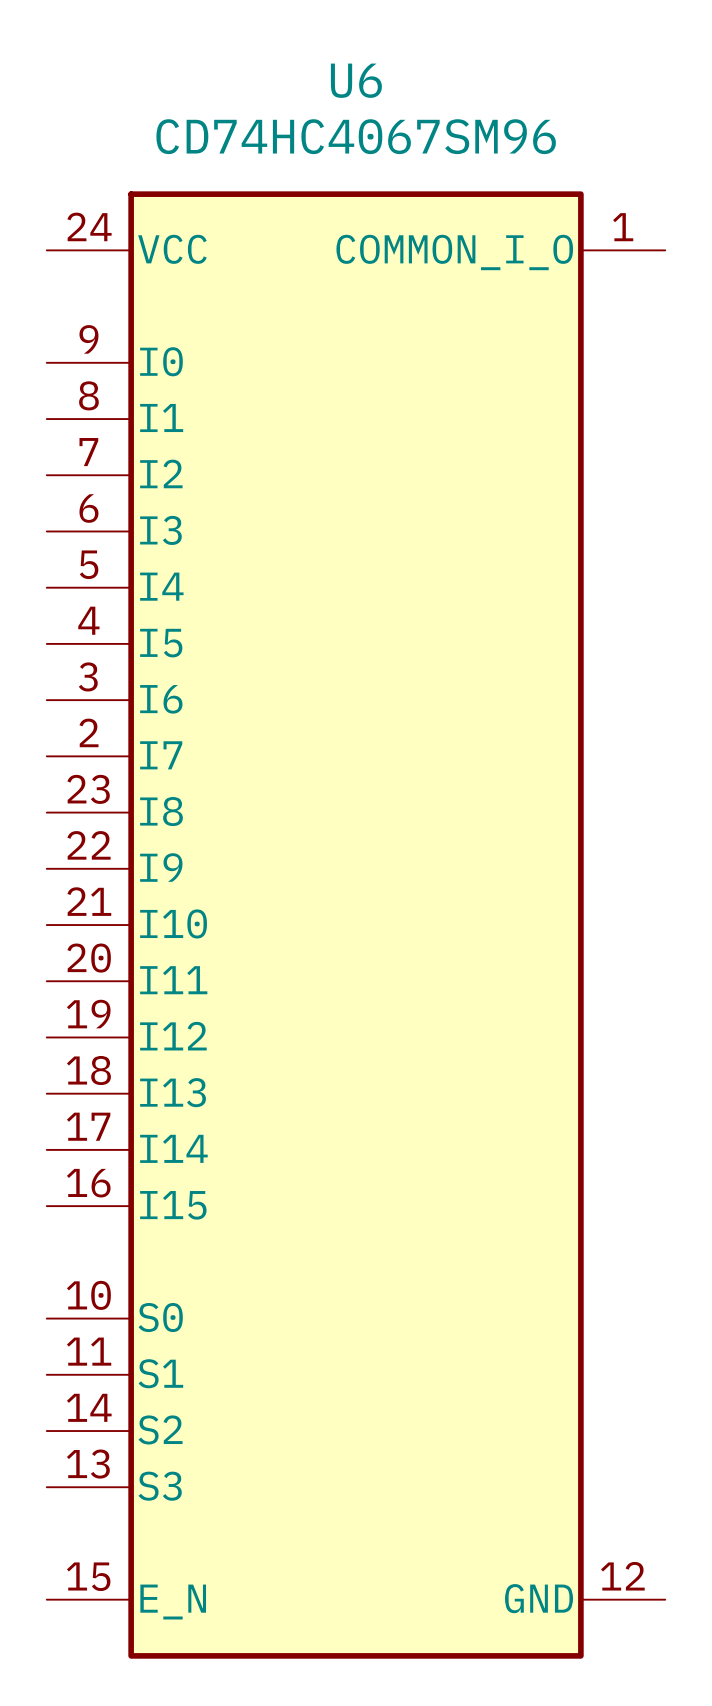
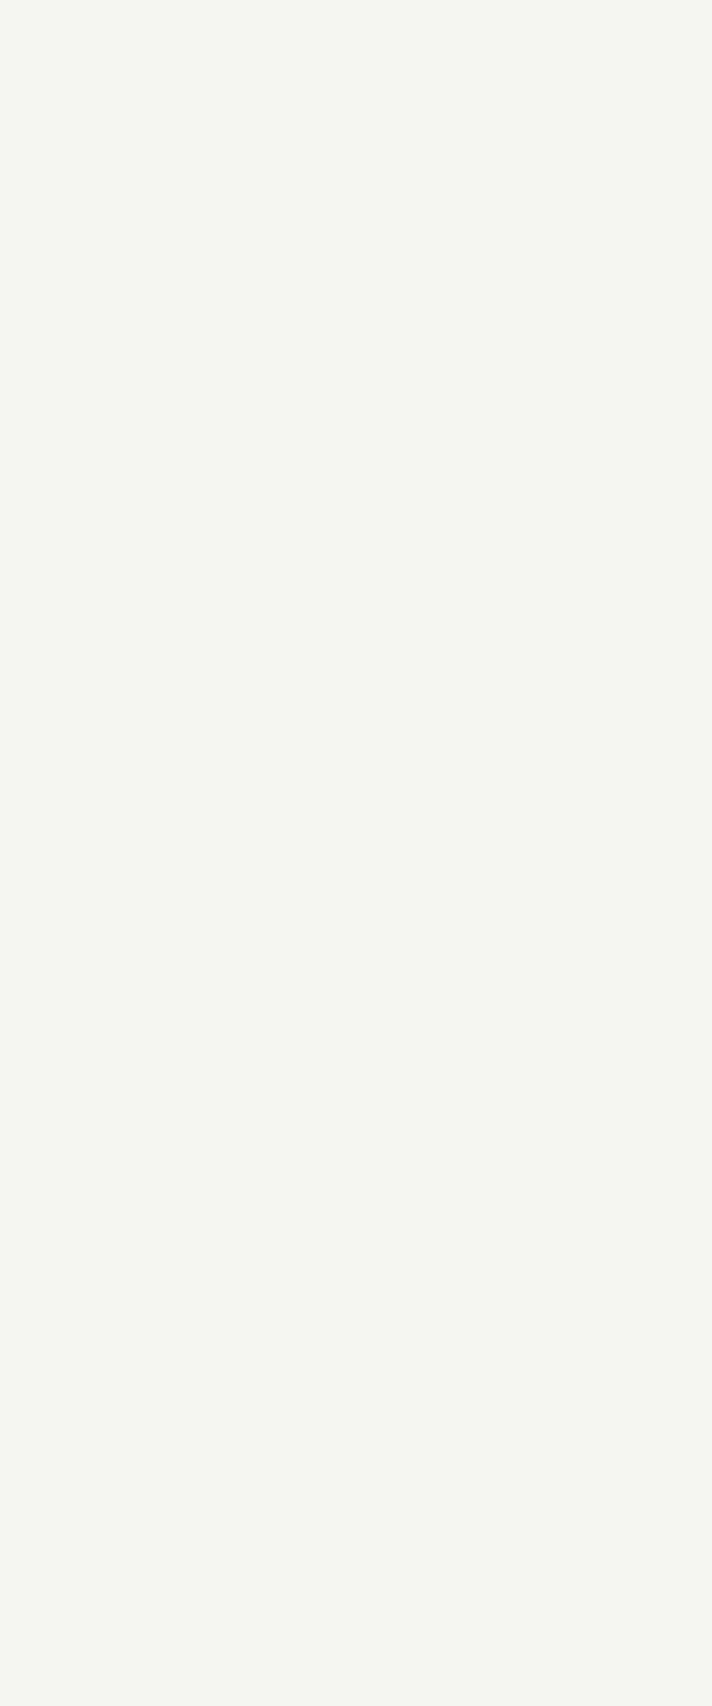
U6: CD74HC4067SM96 (356, 925) -> none

